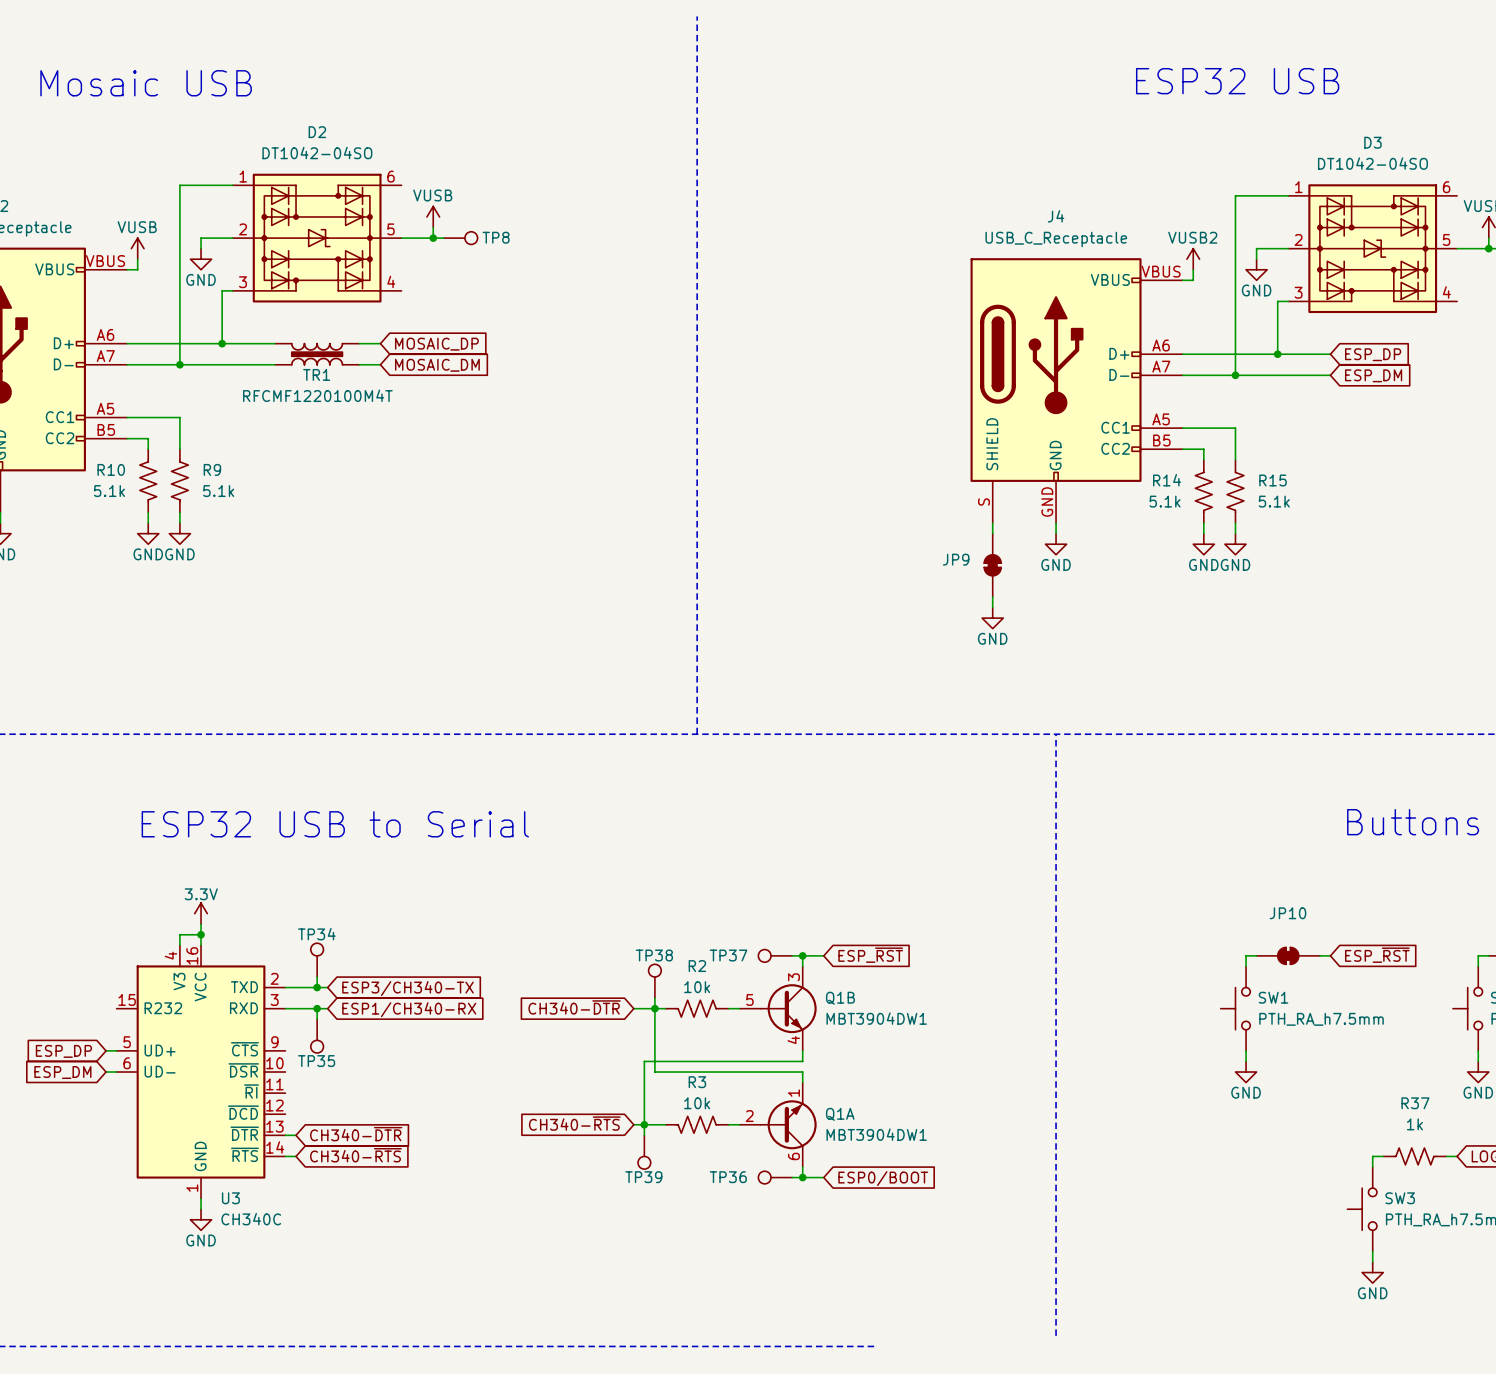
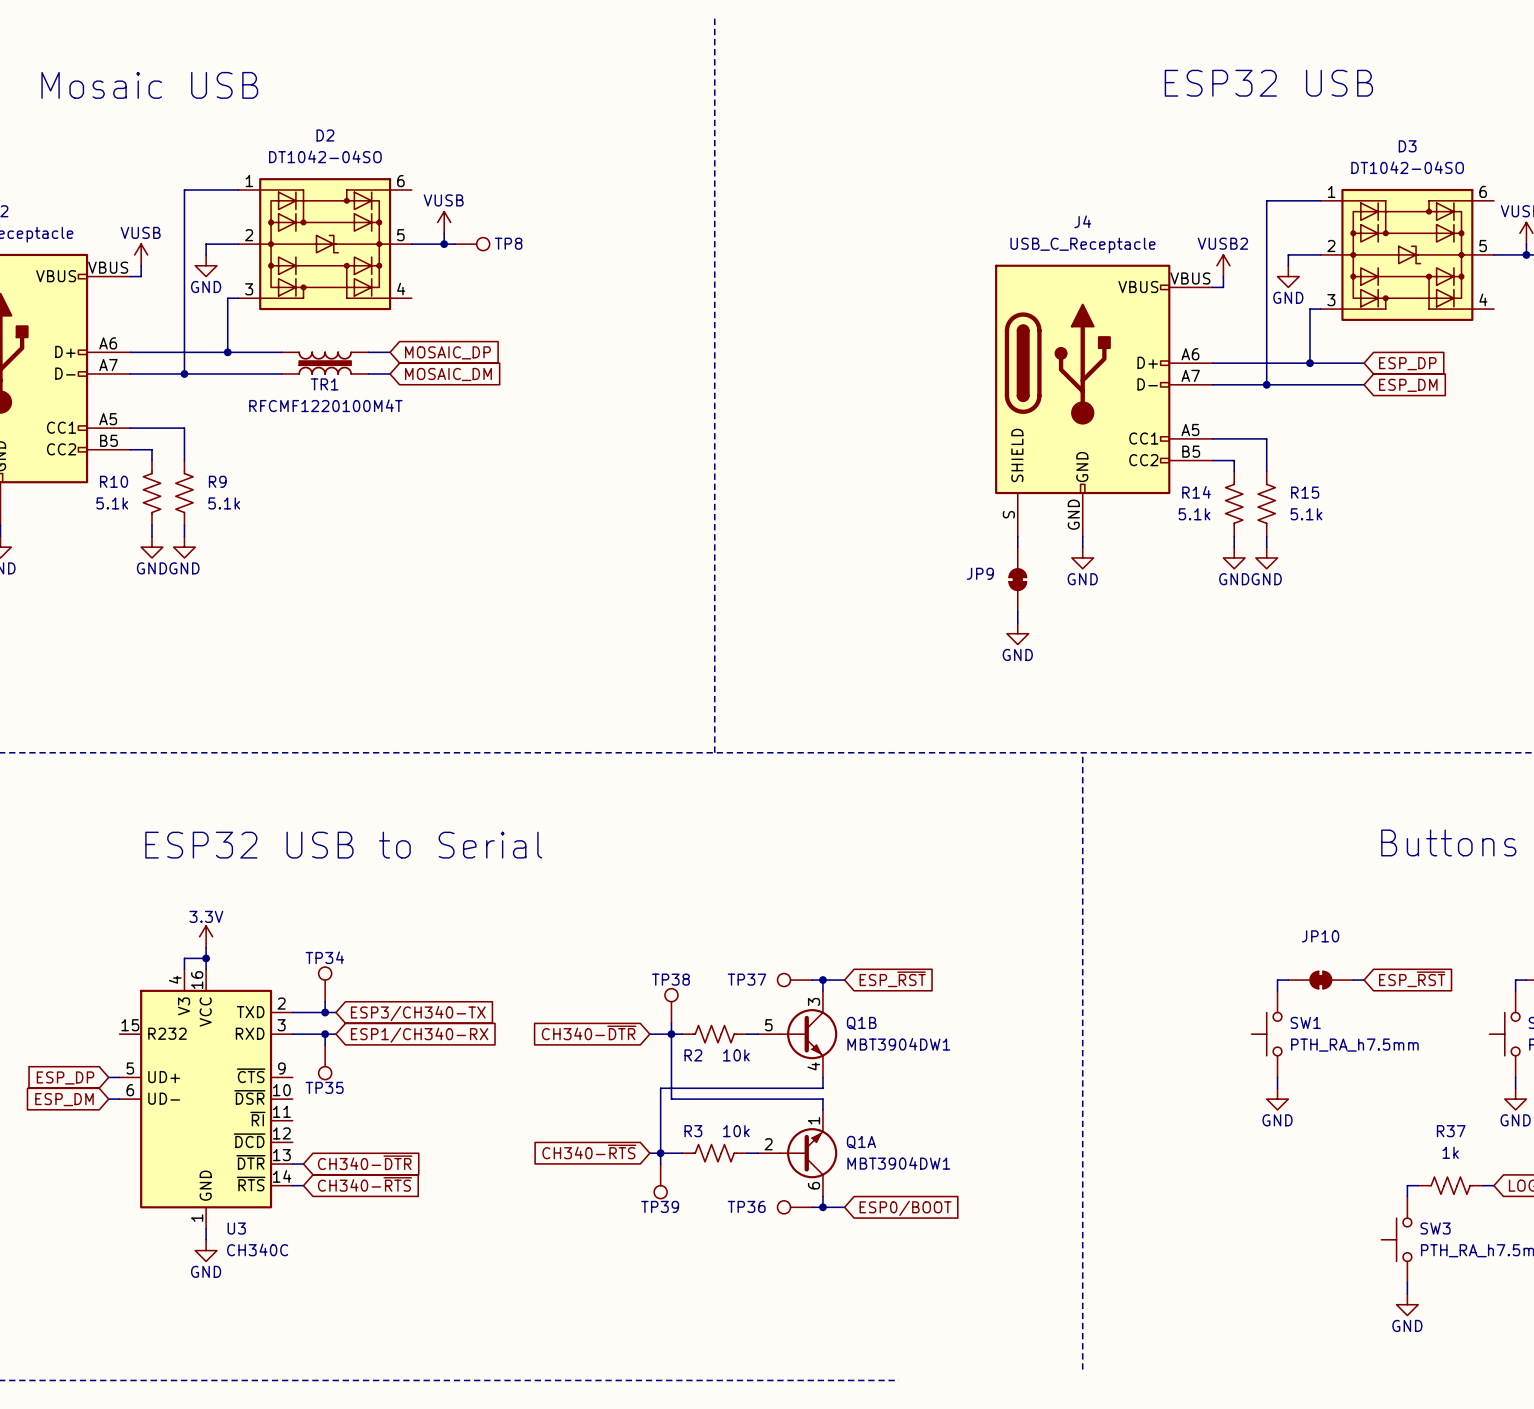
R2 name position: R2 (697, 966) -> R2 (693, 1055)
R2 value position: 10k (697, 987) -> 10k (736, 1055)
R2 flip: as is (697, 1008) -> left-right (714, 1034)
R3 name position: R3 (697, 1082) -> R3 (693, 1131)
R3 value position: 10k (697, 1103) -> 10k (736, 1131)
R3 flip: as is (697, 1124) -> left-right (714, 1153)

